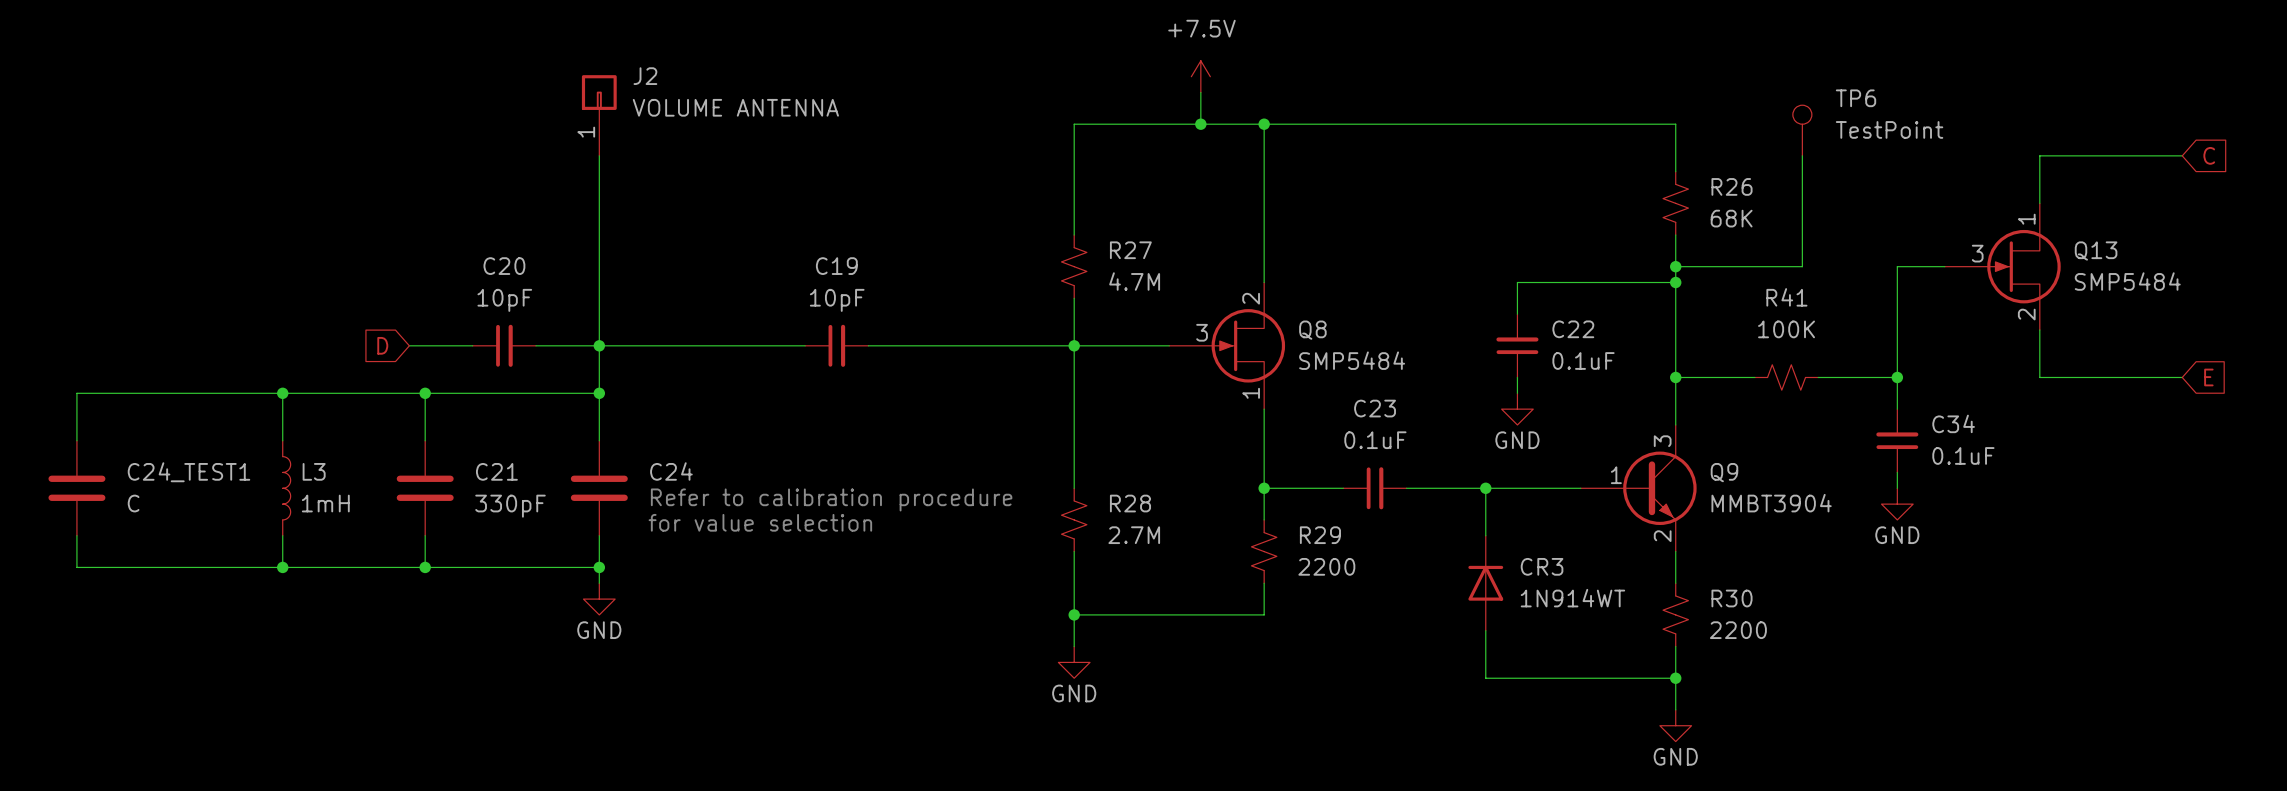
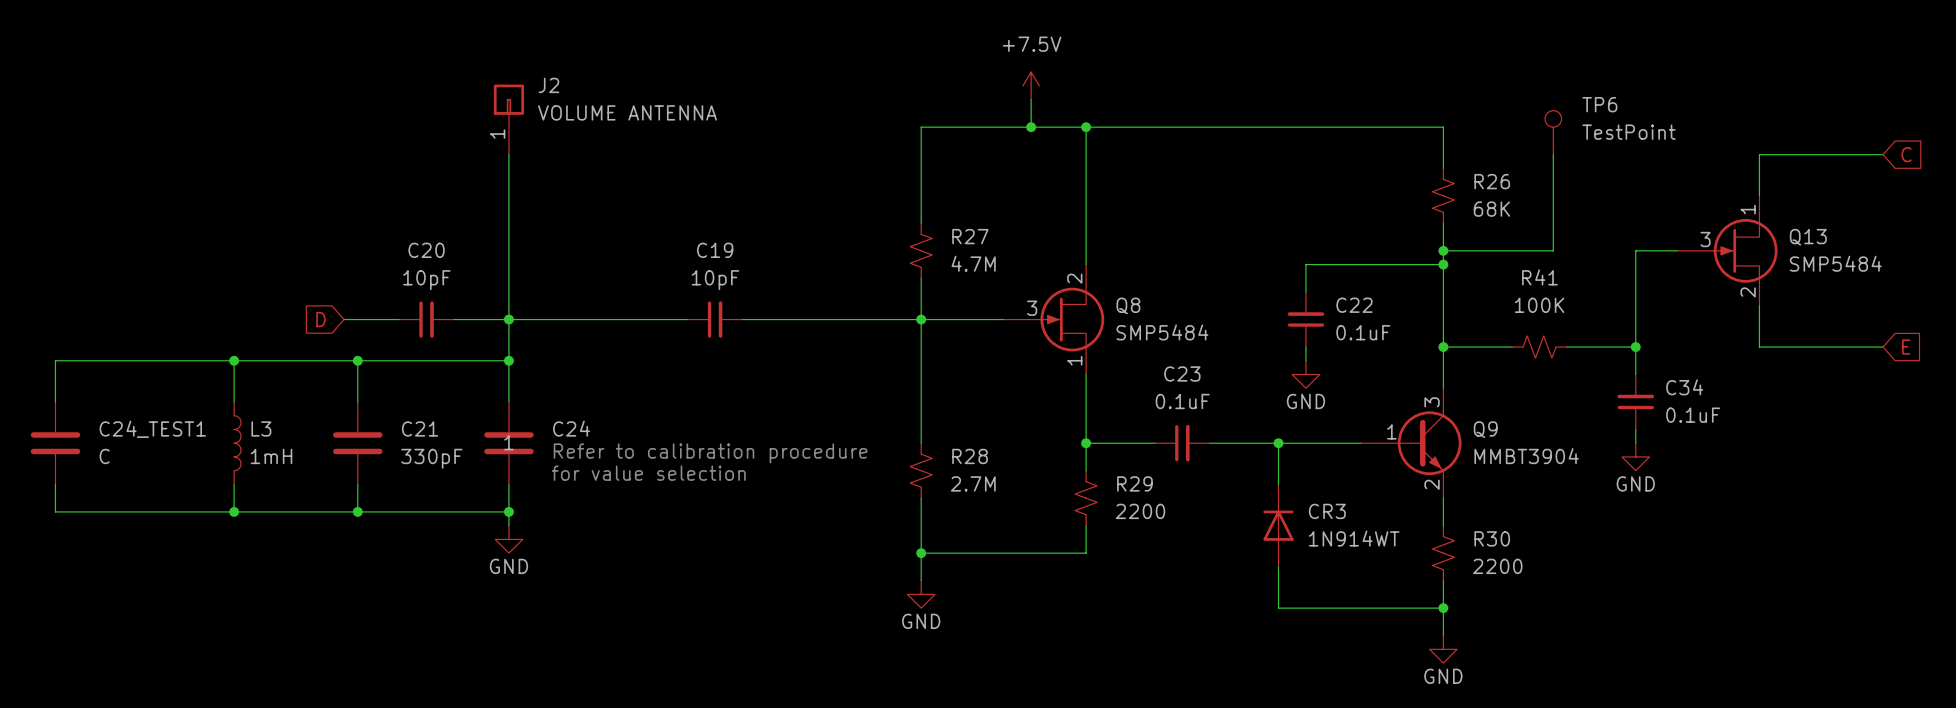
C24 text: none -> 1 (508, 442)

